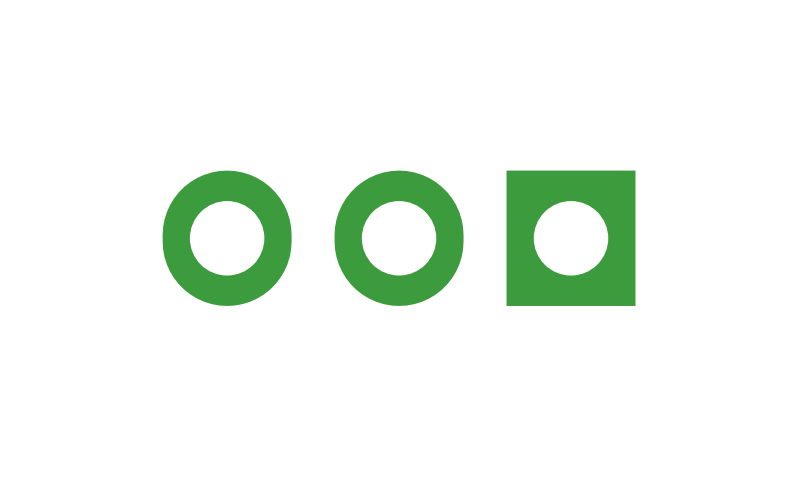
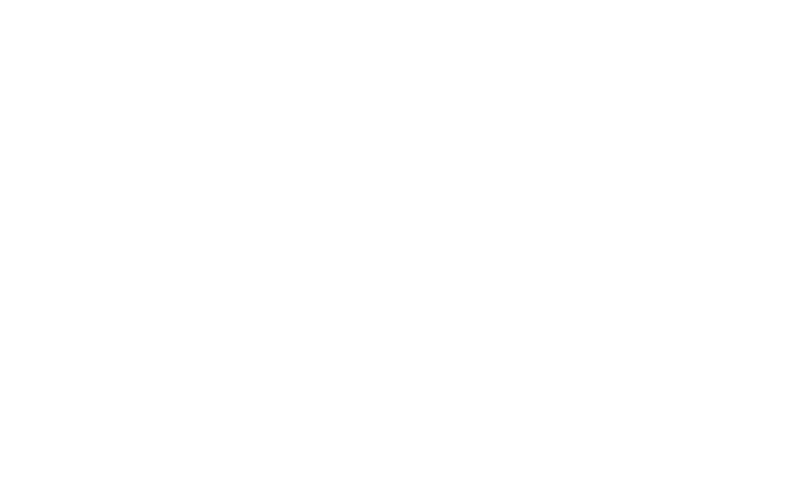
part: (399, 238) -> none

